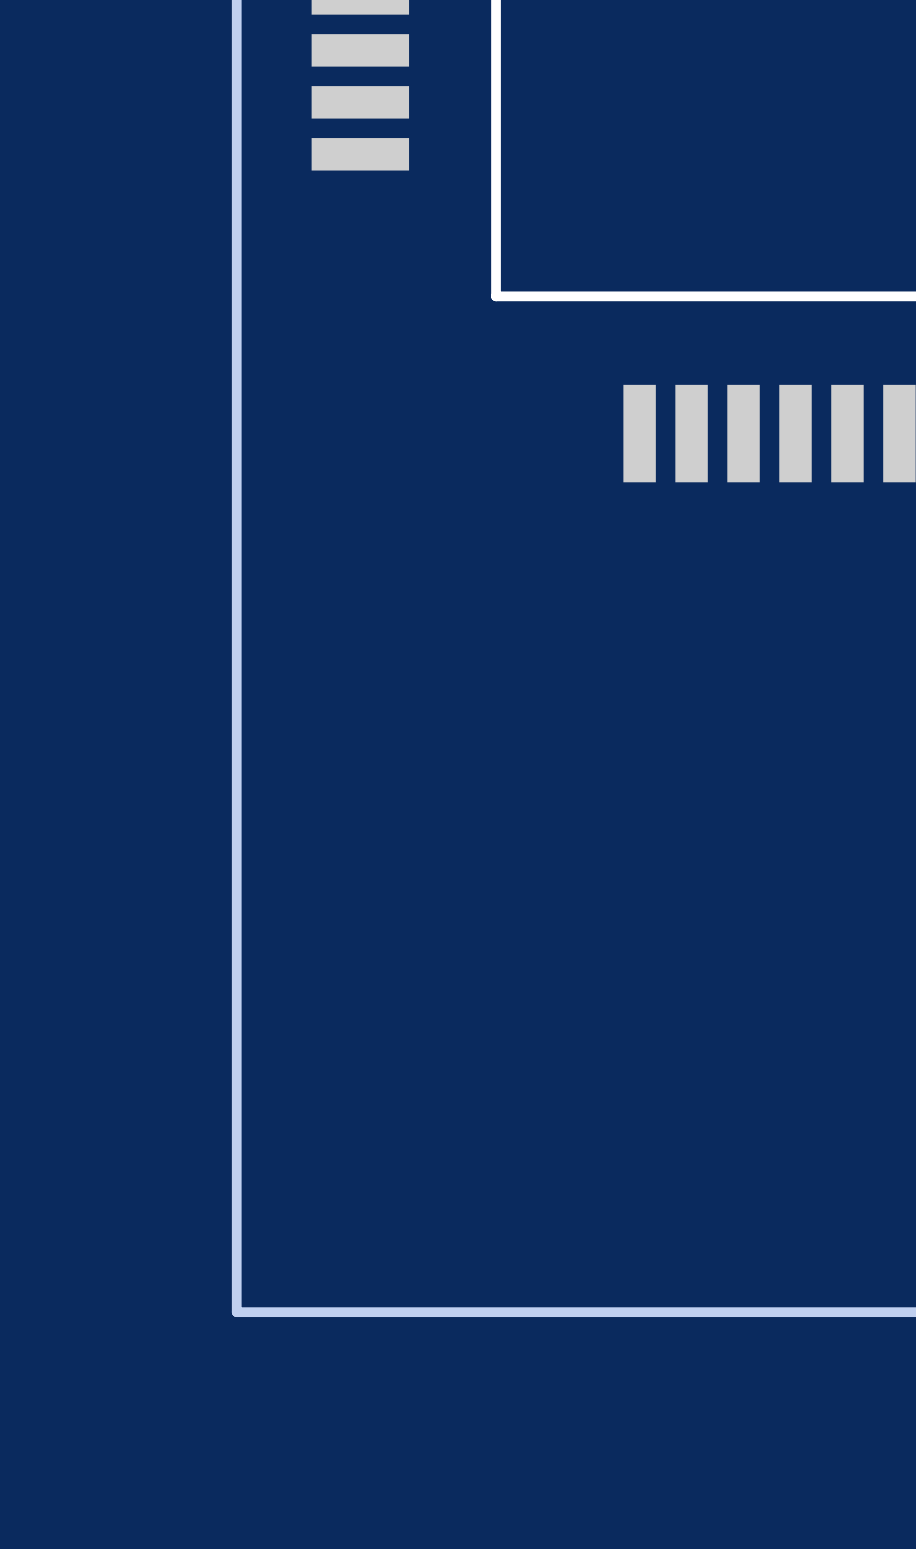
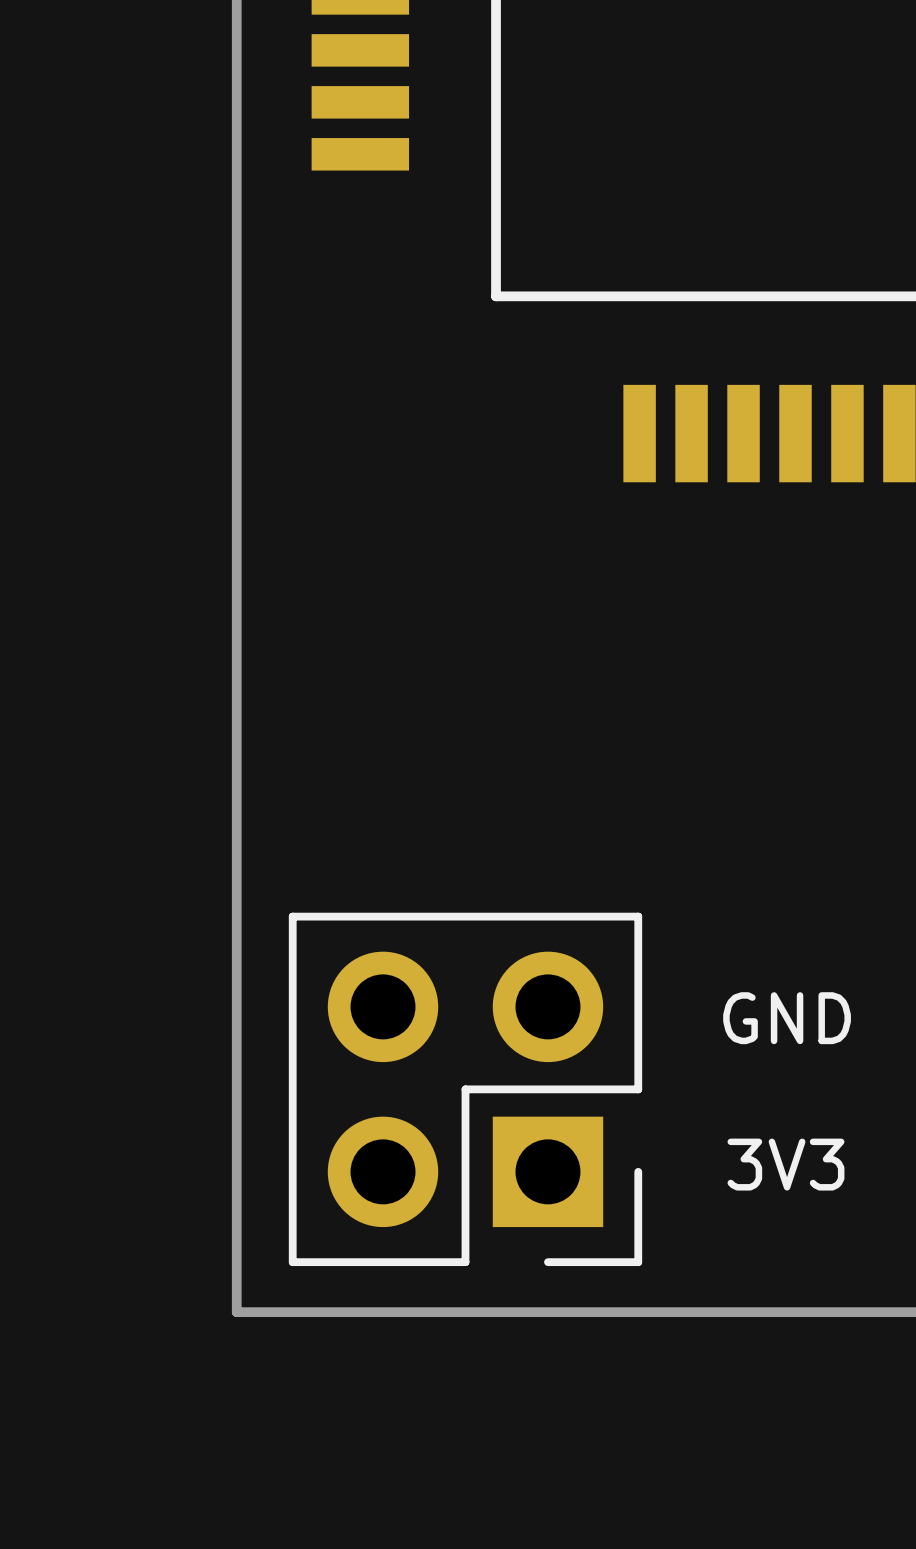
text: none -> GND (787, 1018)
part: none -> (465, 1089)
text: none -> 3V3 (785, 1164)

